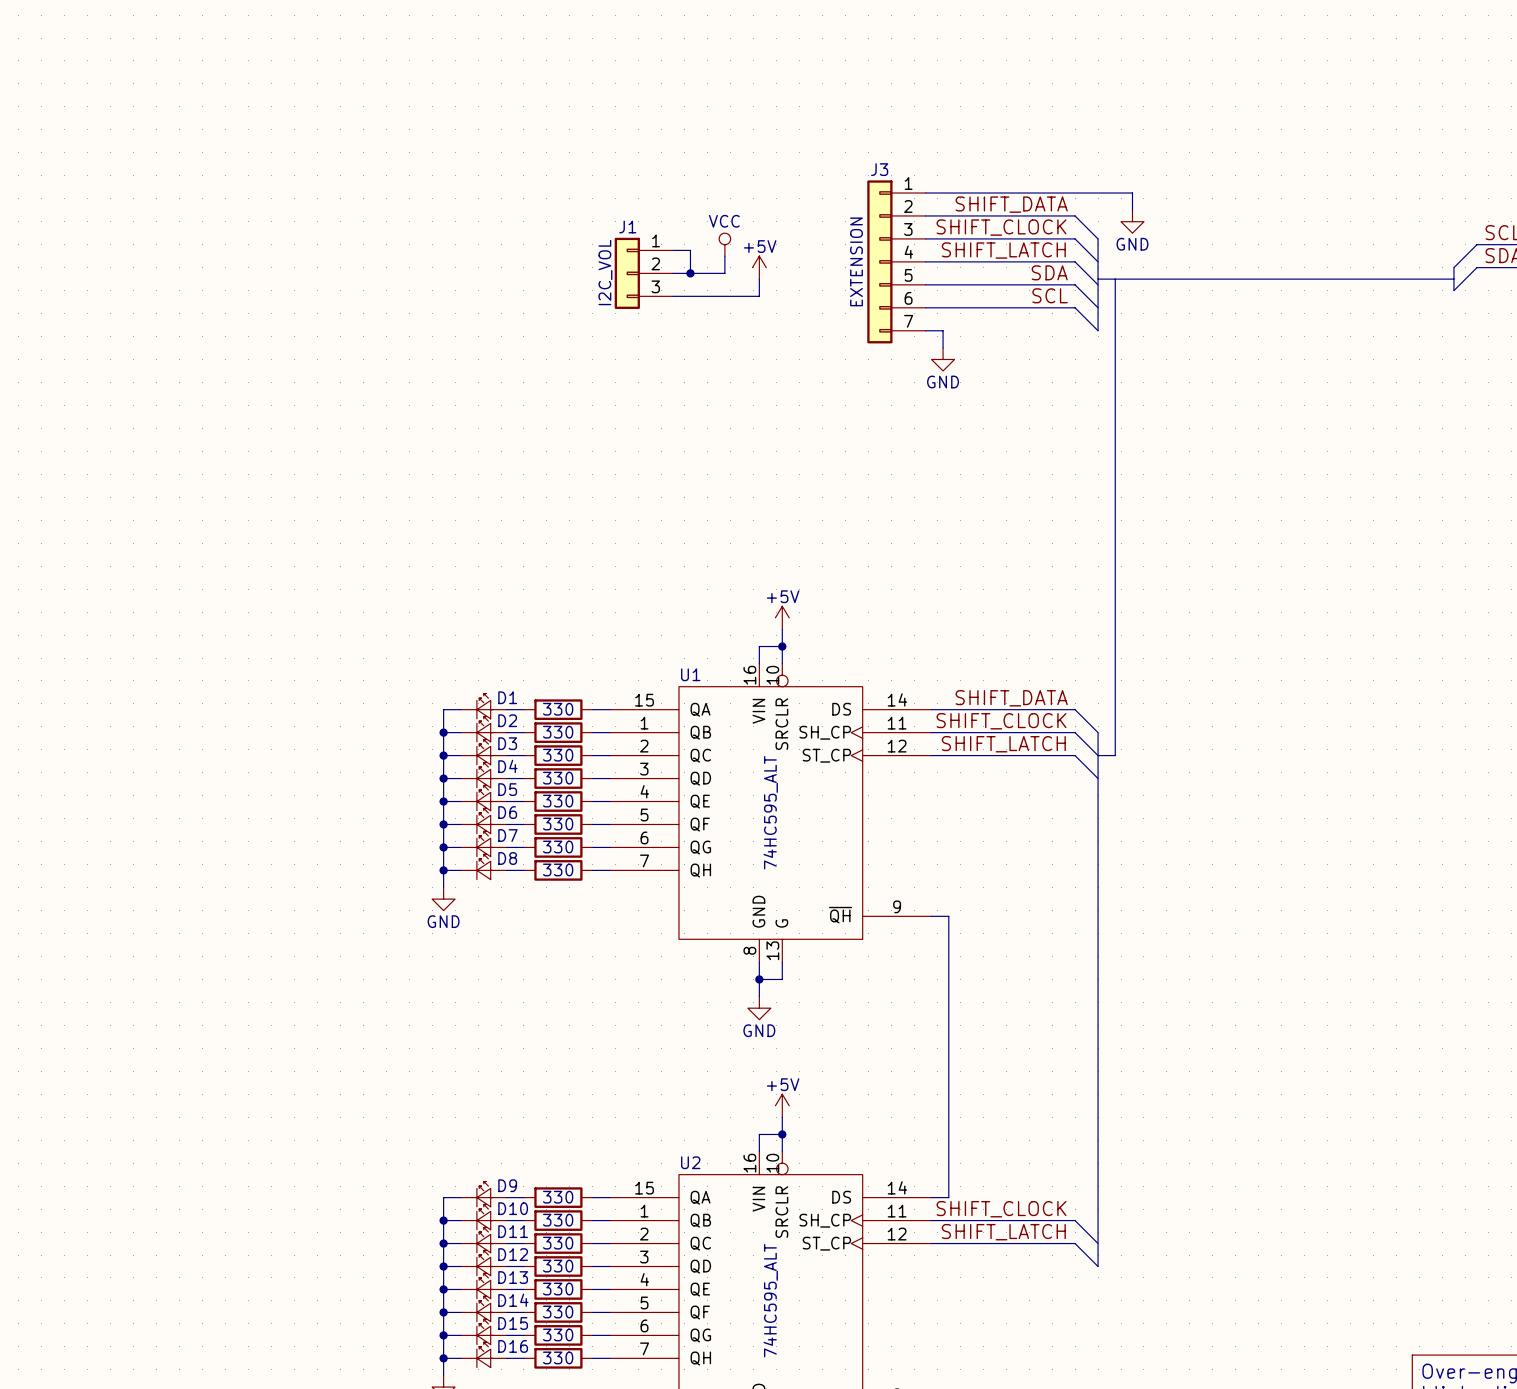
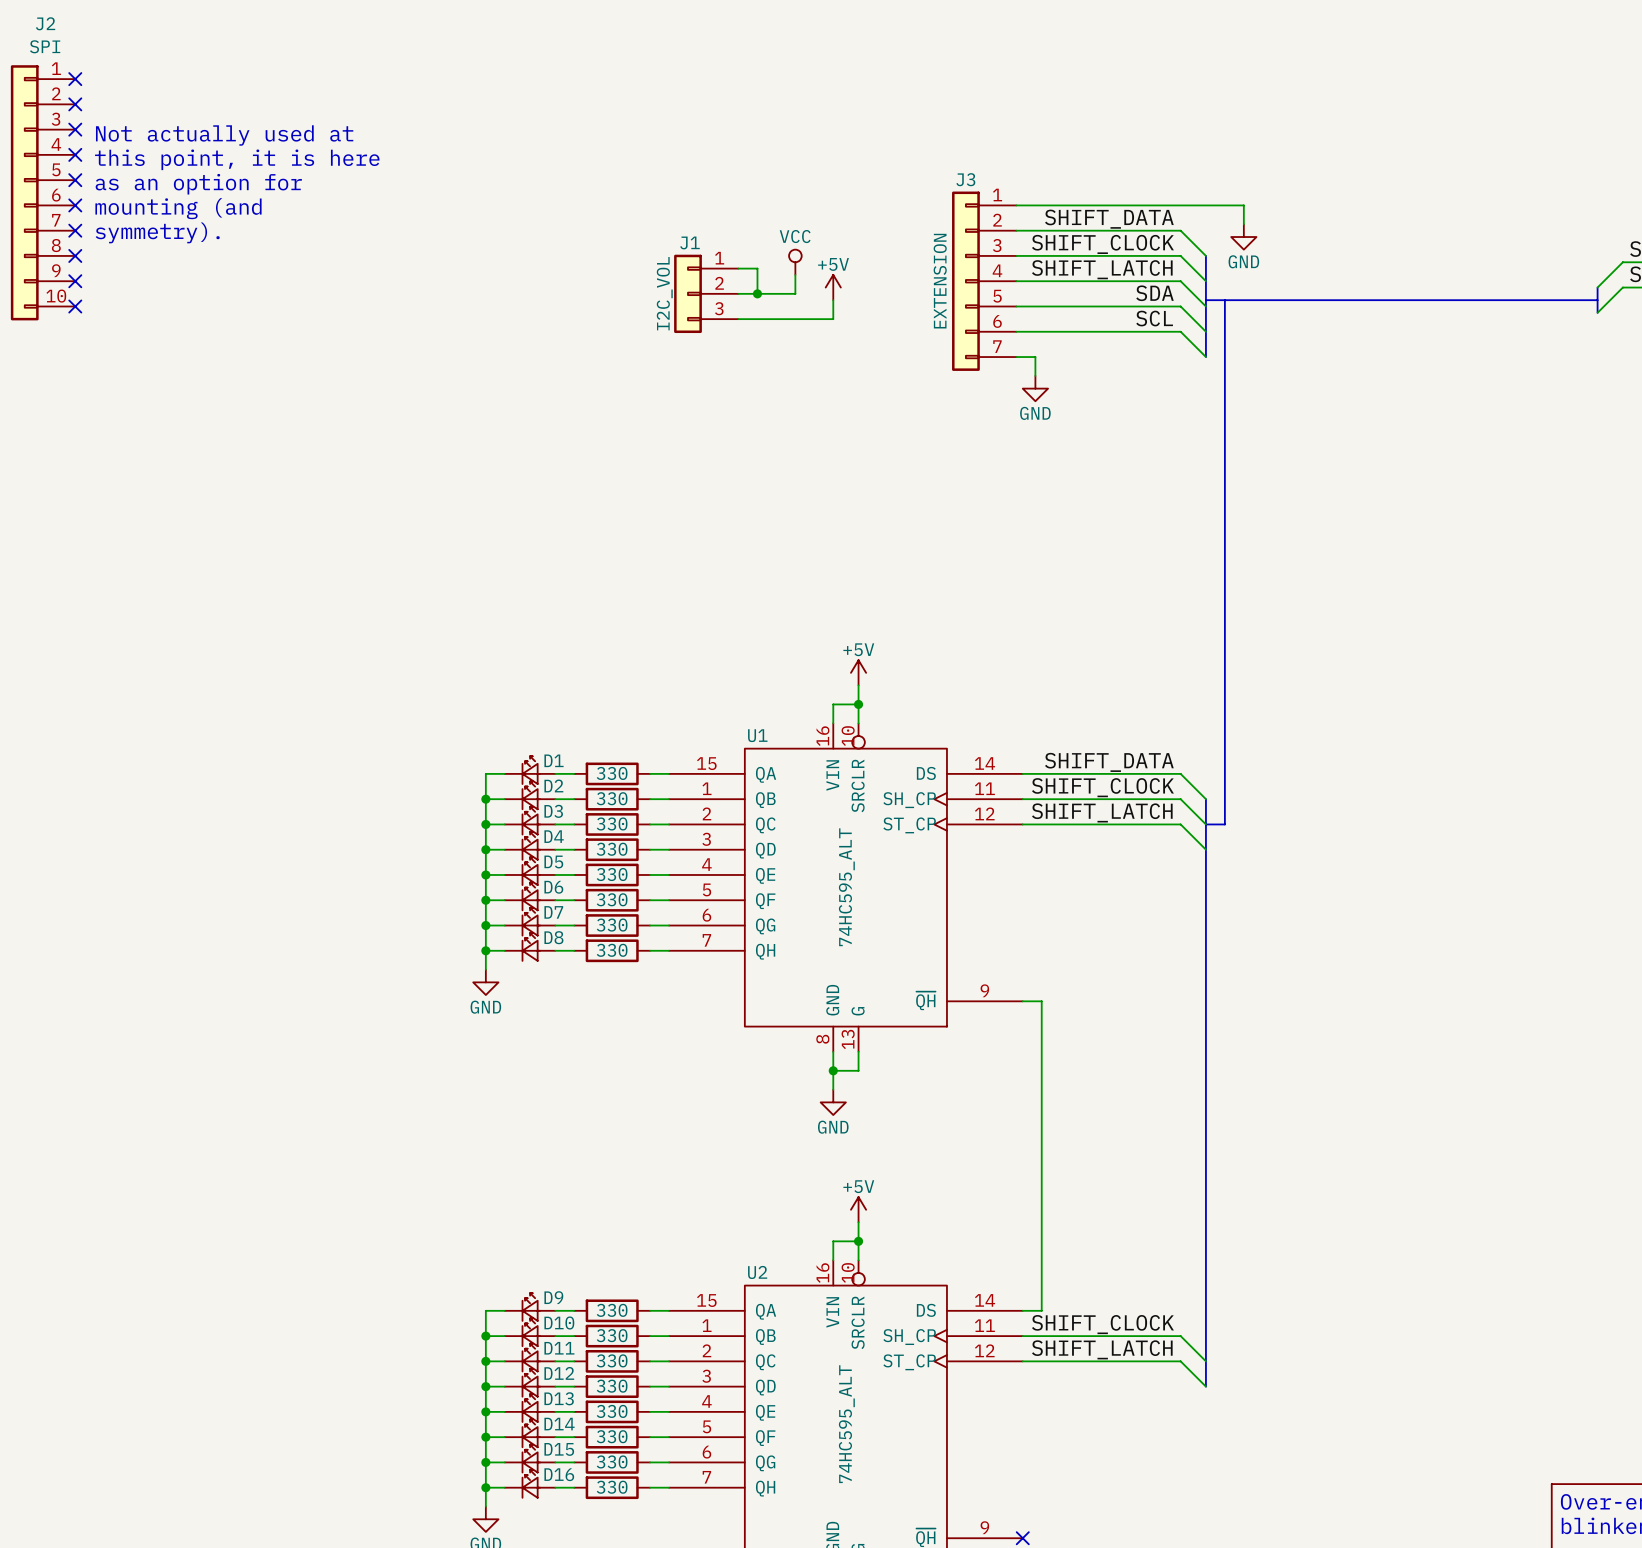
no-connect mark: none -> (75, 79)
no-connect mark: none -> (75, 104)
no-connect mark: none -> (75, 129)
text: none -> Not actually used at (224, 135)
no-connect mark: none -> (75, 154)
text: none -> this point, it is here (237, 159)
no-connect mark: none -> (75, 180)
text: none -> as an option for (198, 184)
J2: none -> SPI (43, 192)
no-connect mark: none -> (75, 205)
text: none -> mounting (and (178, 208)
no-connect mark: none -> (75, 230)
text: none -> symmetry). (157, 232)
no-connect mark: none -> (75, 255)
no-connect mark: none -> (75, 281)
no-connect mark: none -> (75, 306)

